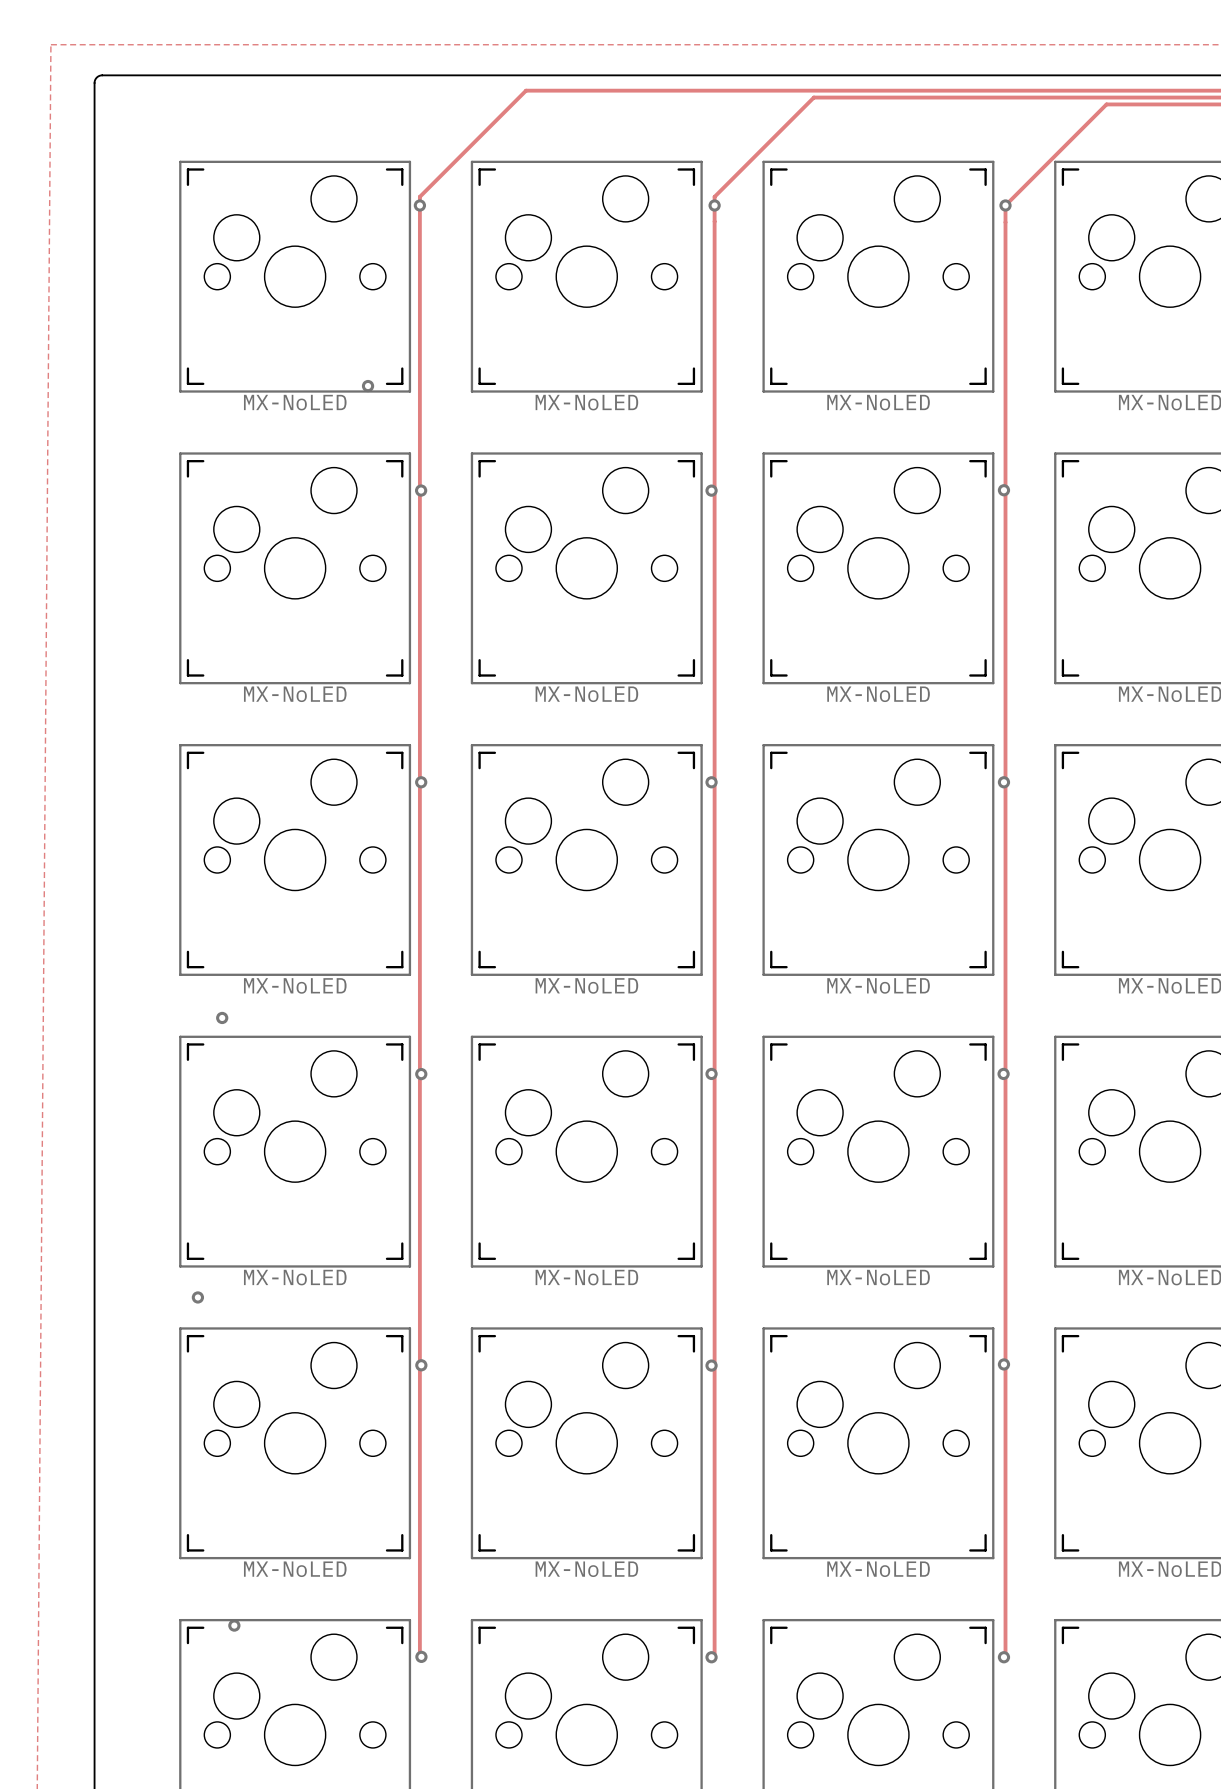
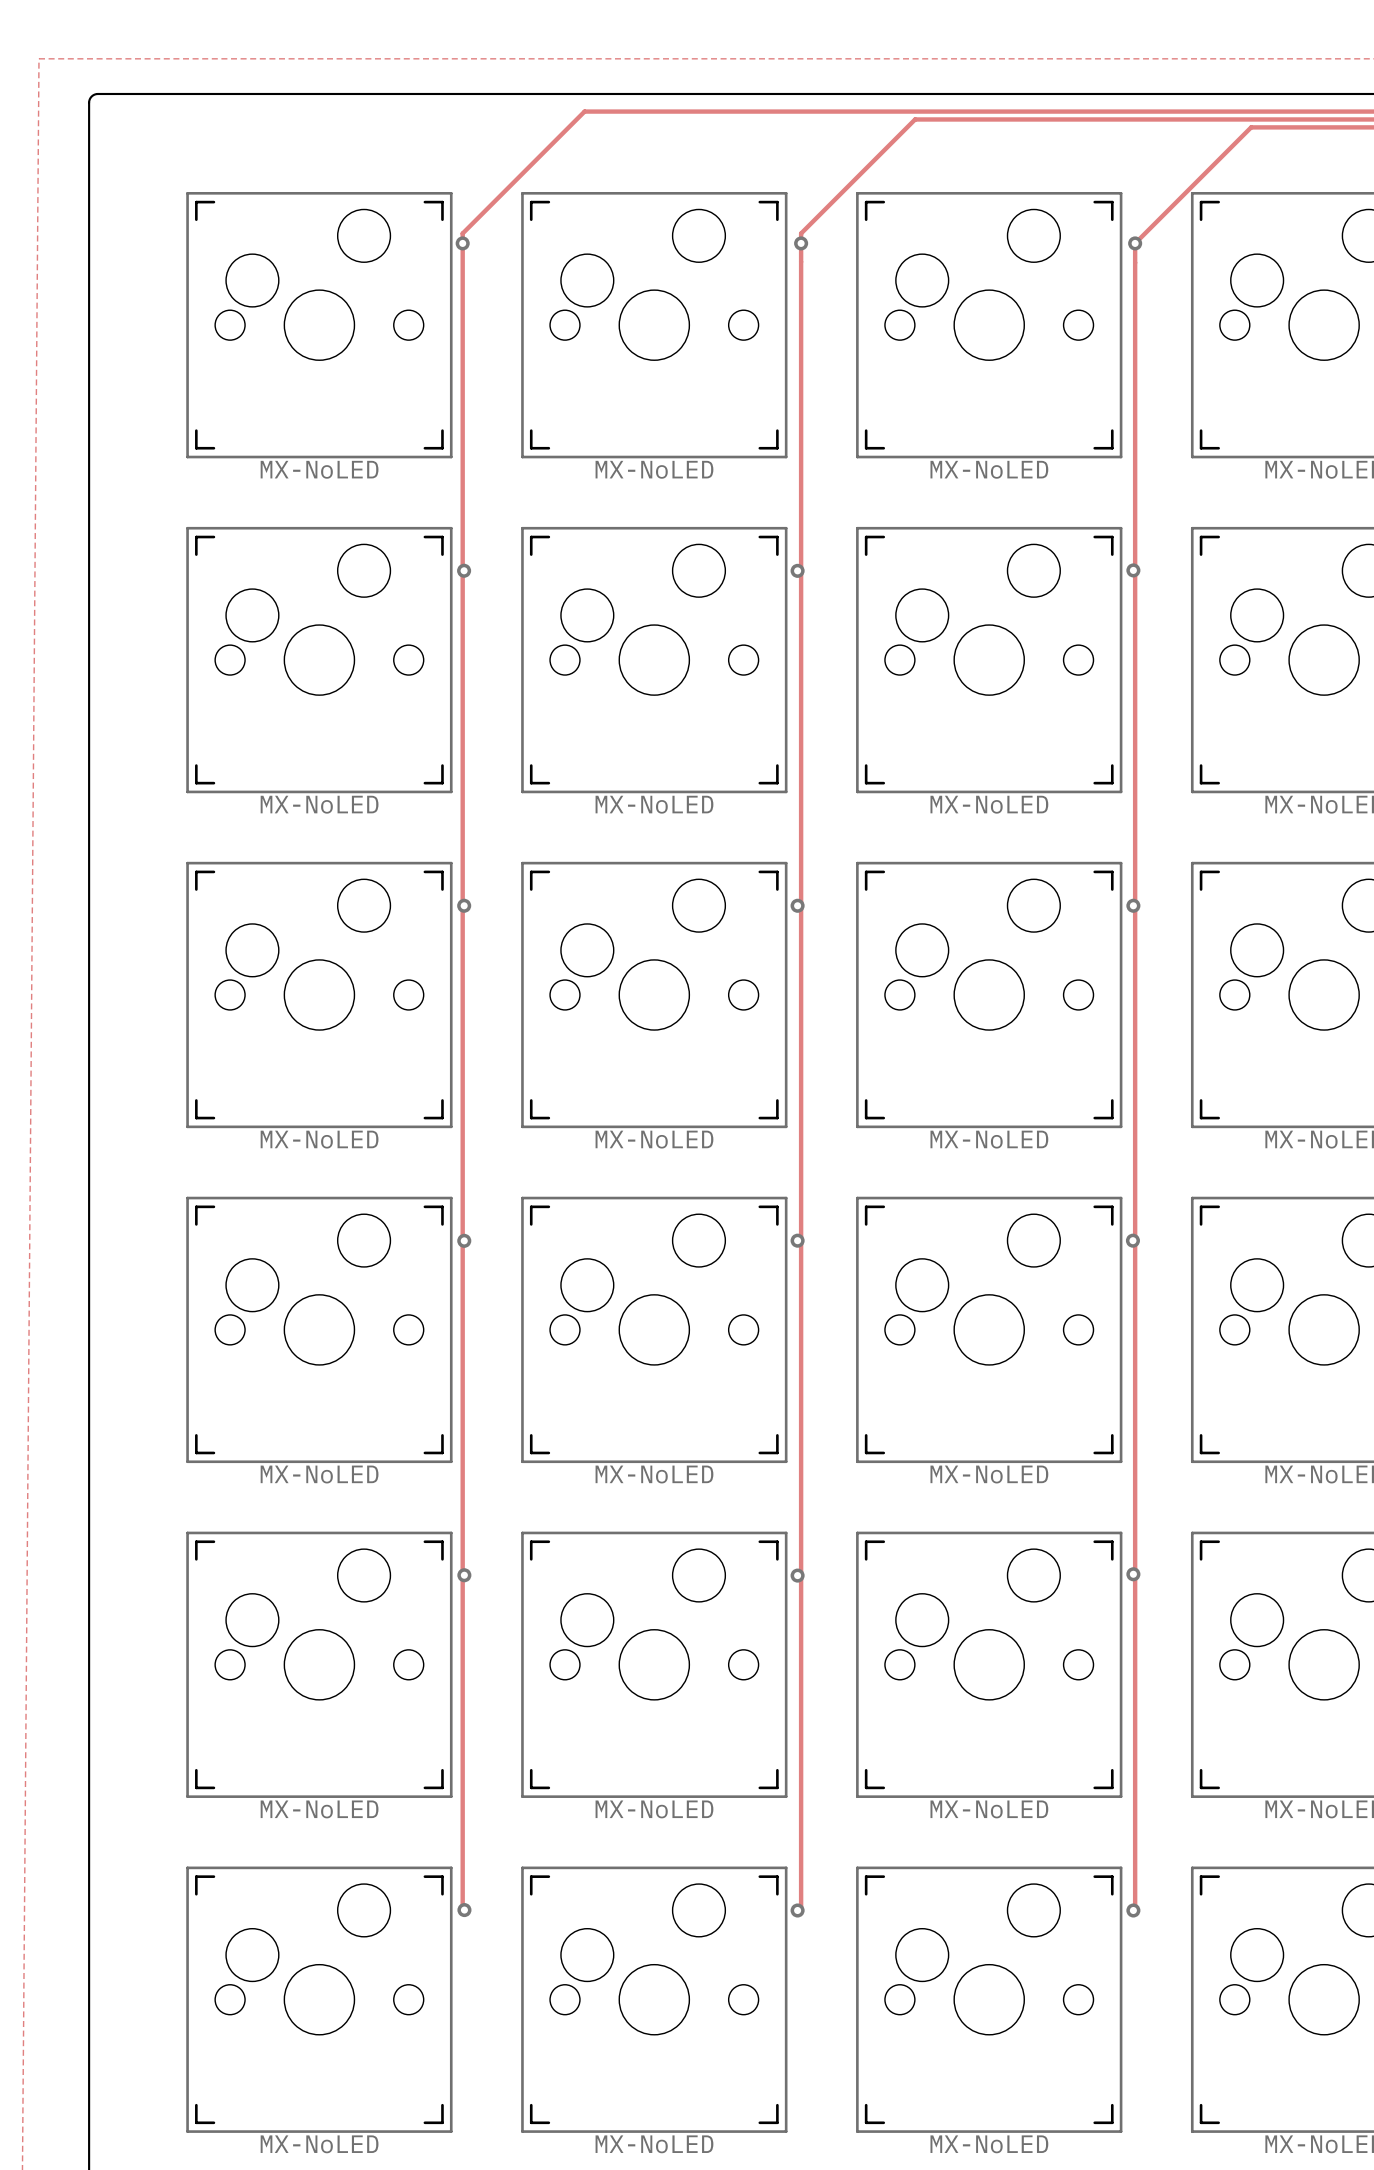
via: (368, 386) -> none
via: (222, 1017) -> none
via: (197, 1297) -> none
via: (234, 1625) -> none

